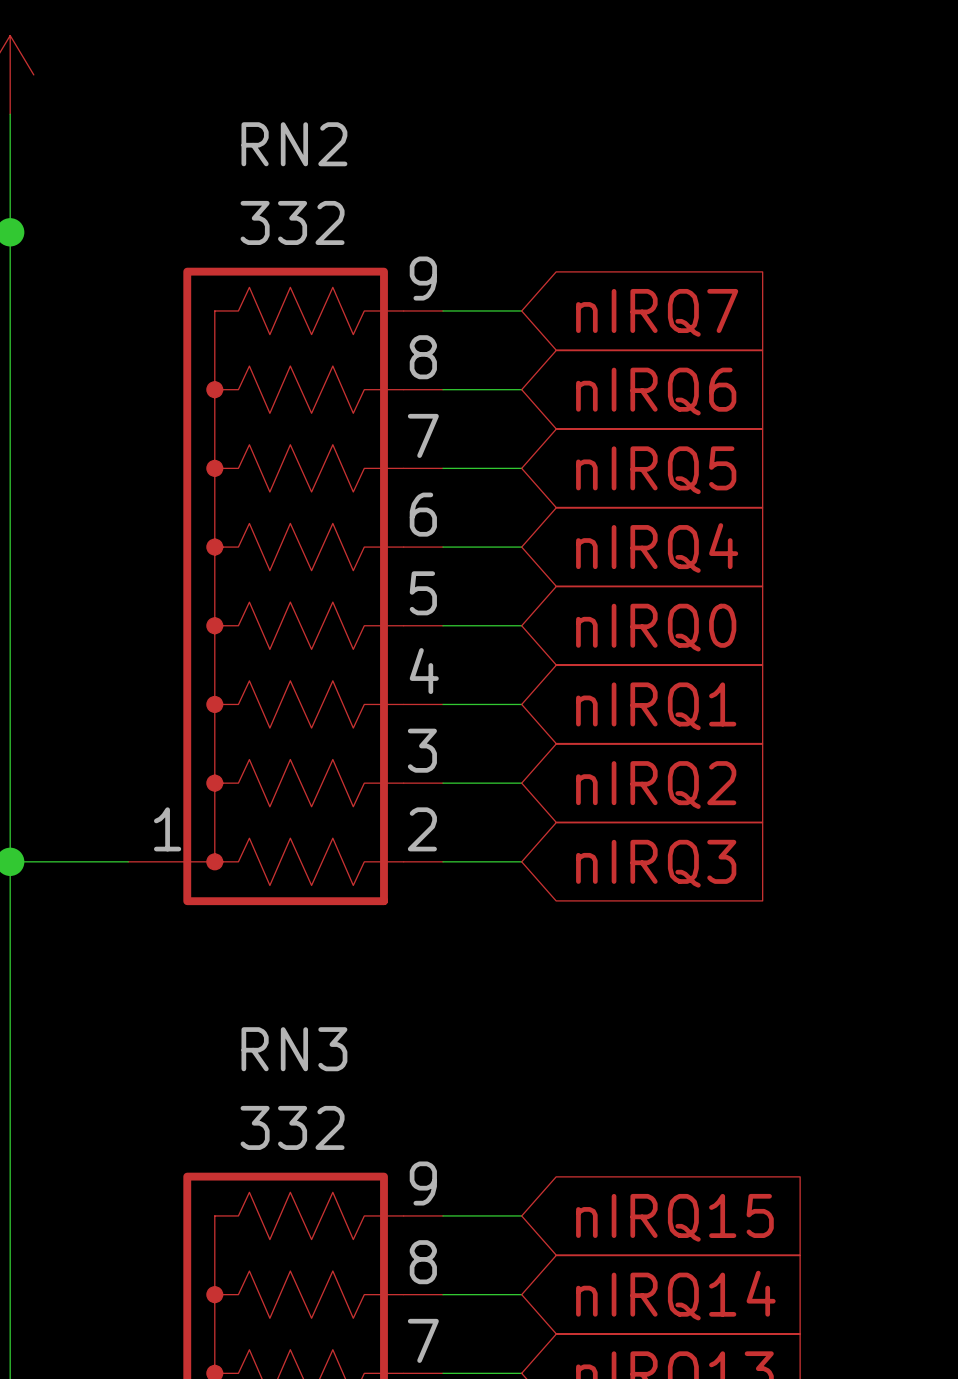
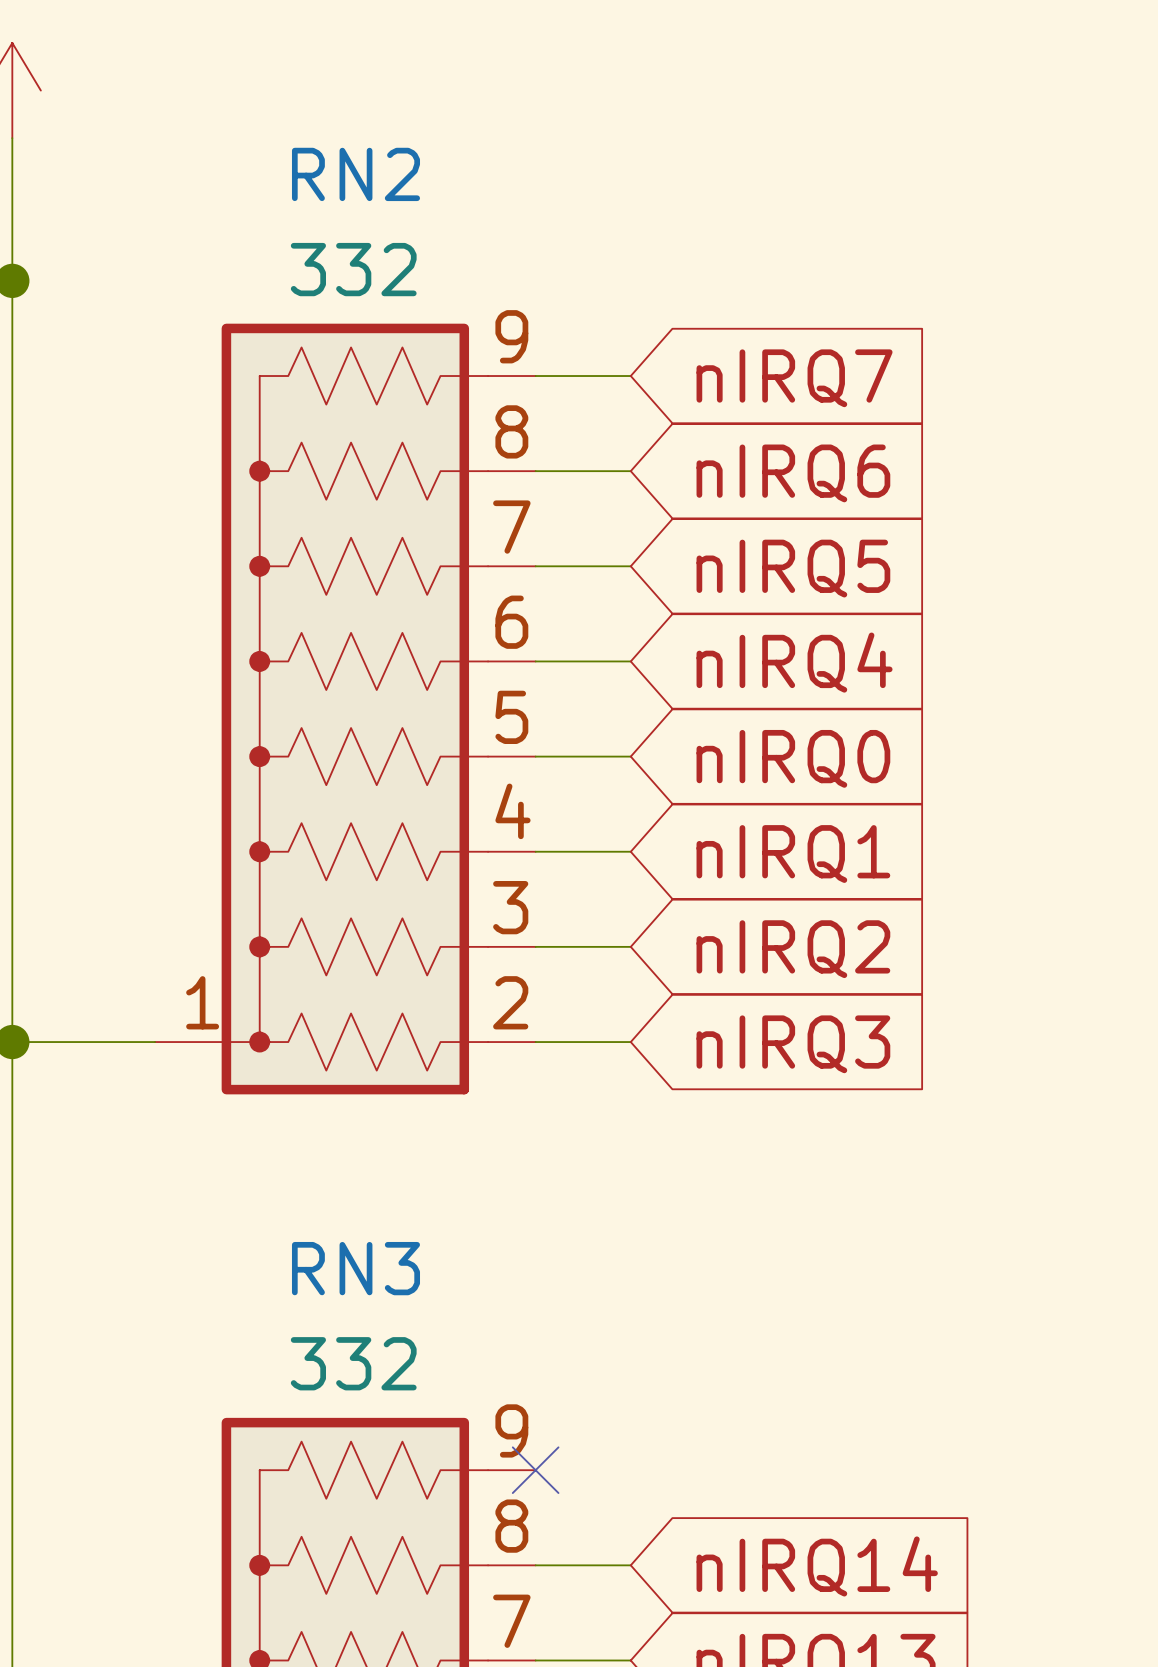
wire: (443, 1215) (521, 1215) -> none
no-connect mark: none -> (535, 1470)
global label: nIRQ15 (674, 1217) -> none

